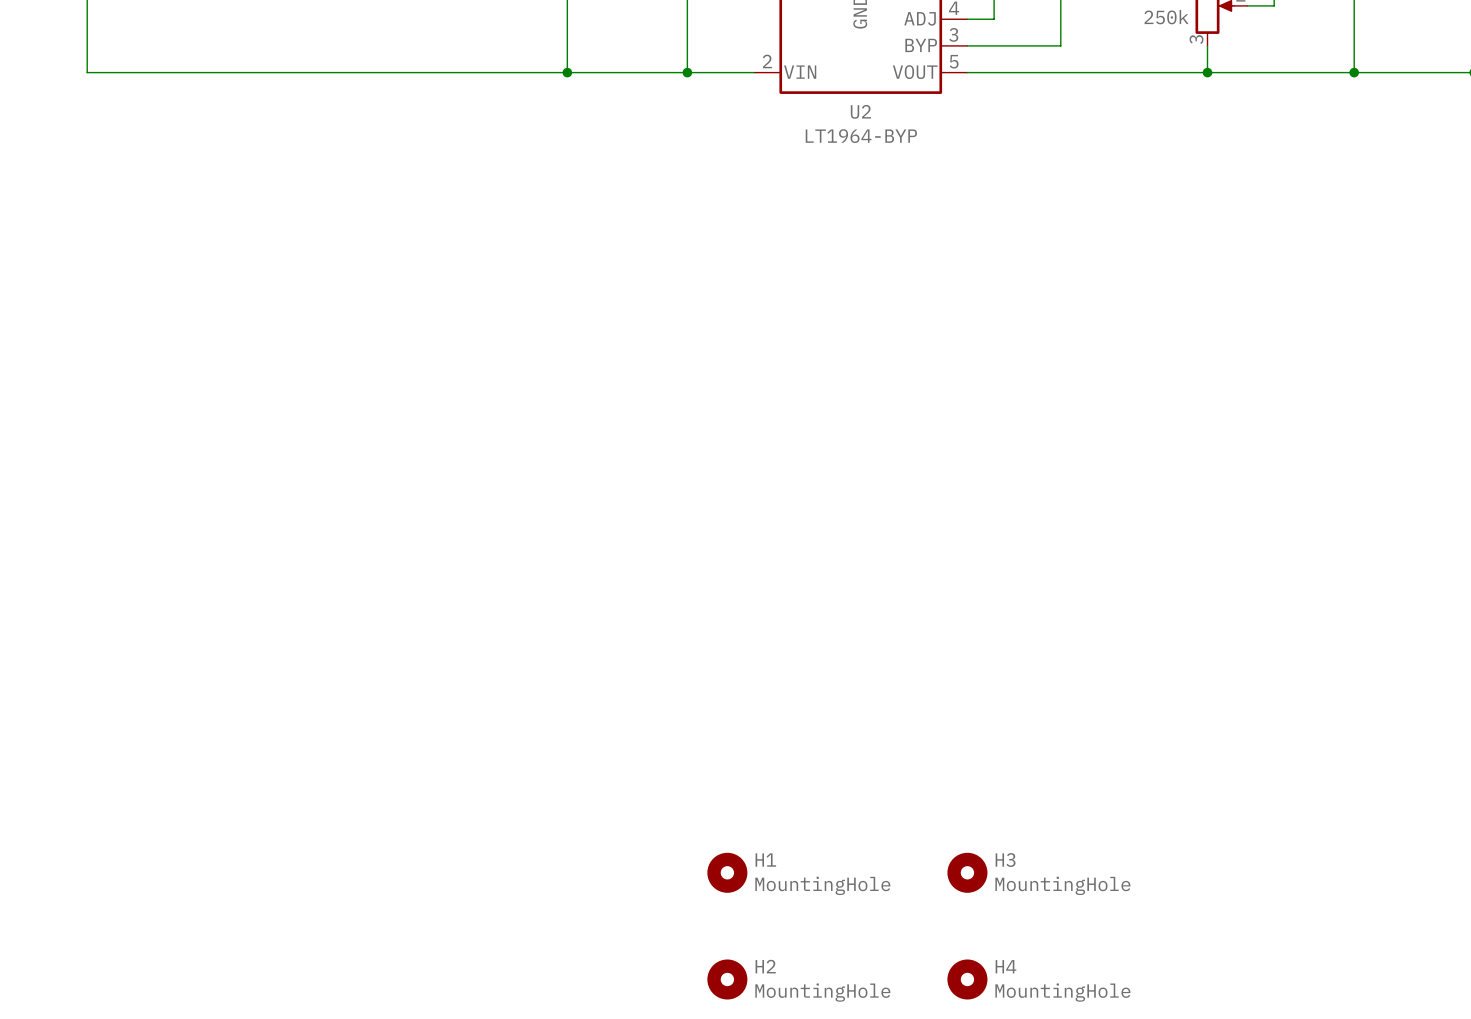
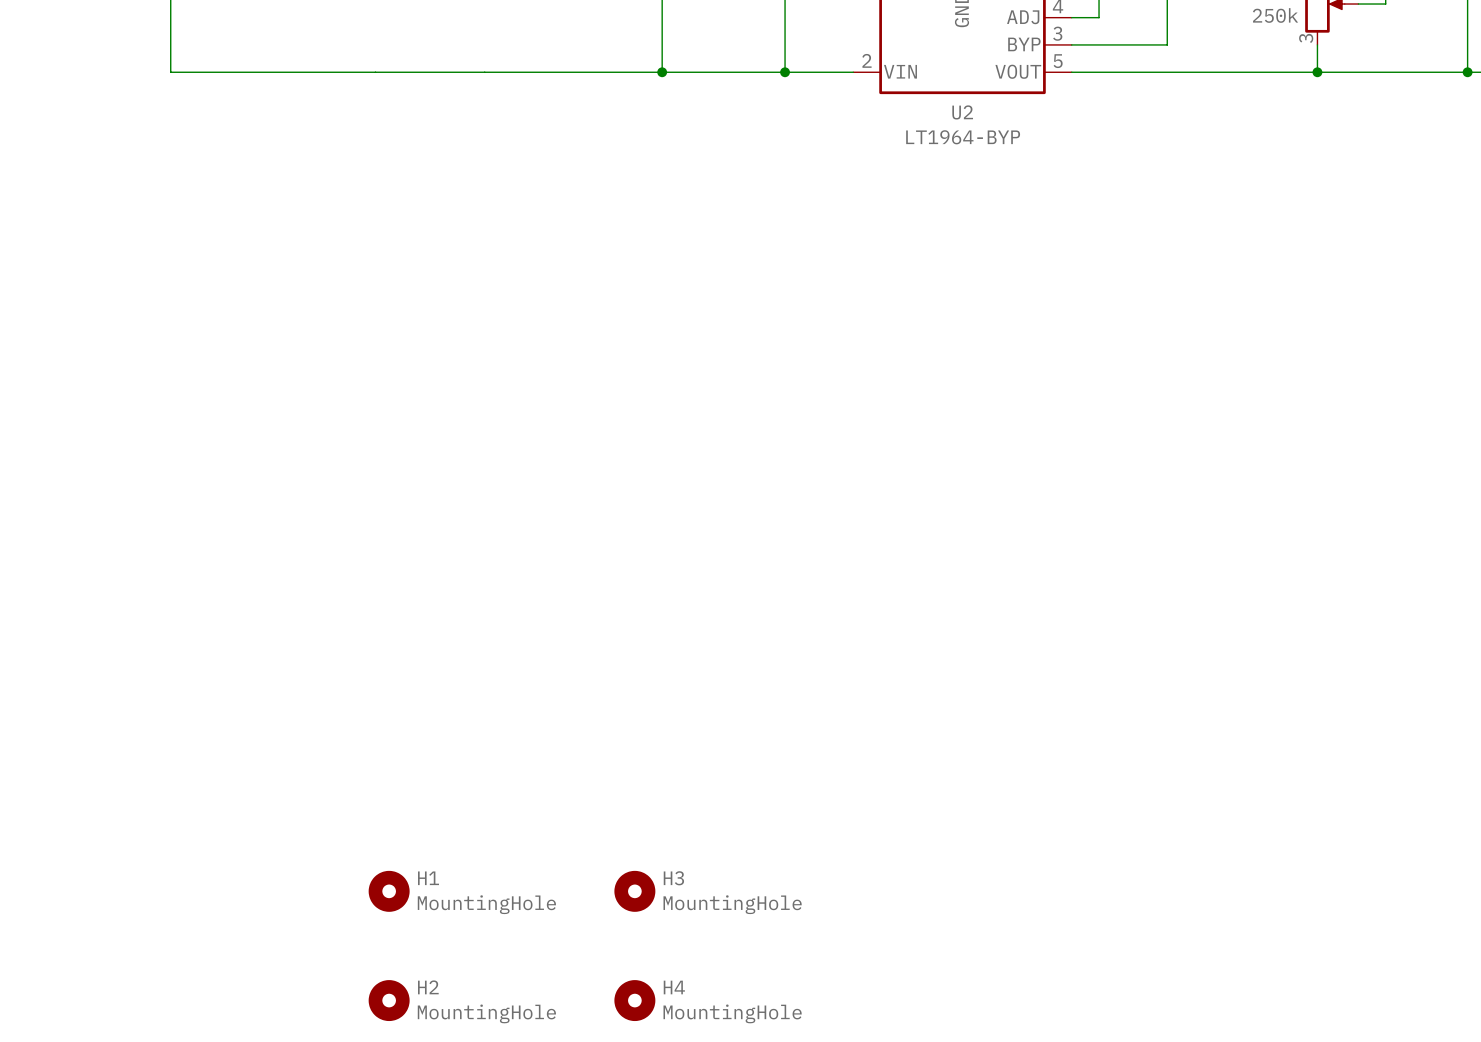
H1 position: (727, 872) -> (389, 891)
H3 position: (967, 872) -> (634, 891)
H2 position: (727, 979) -> (389, 1000)
H4 position: (967, 979) -> (634, 1000)

